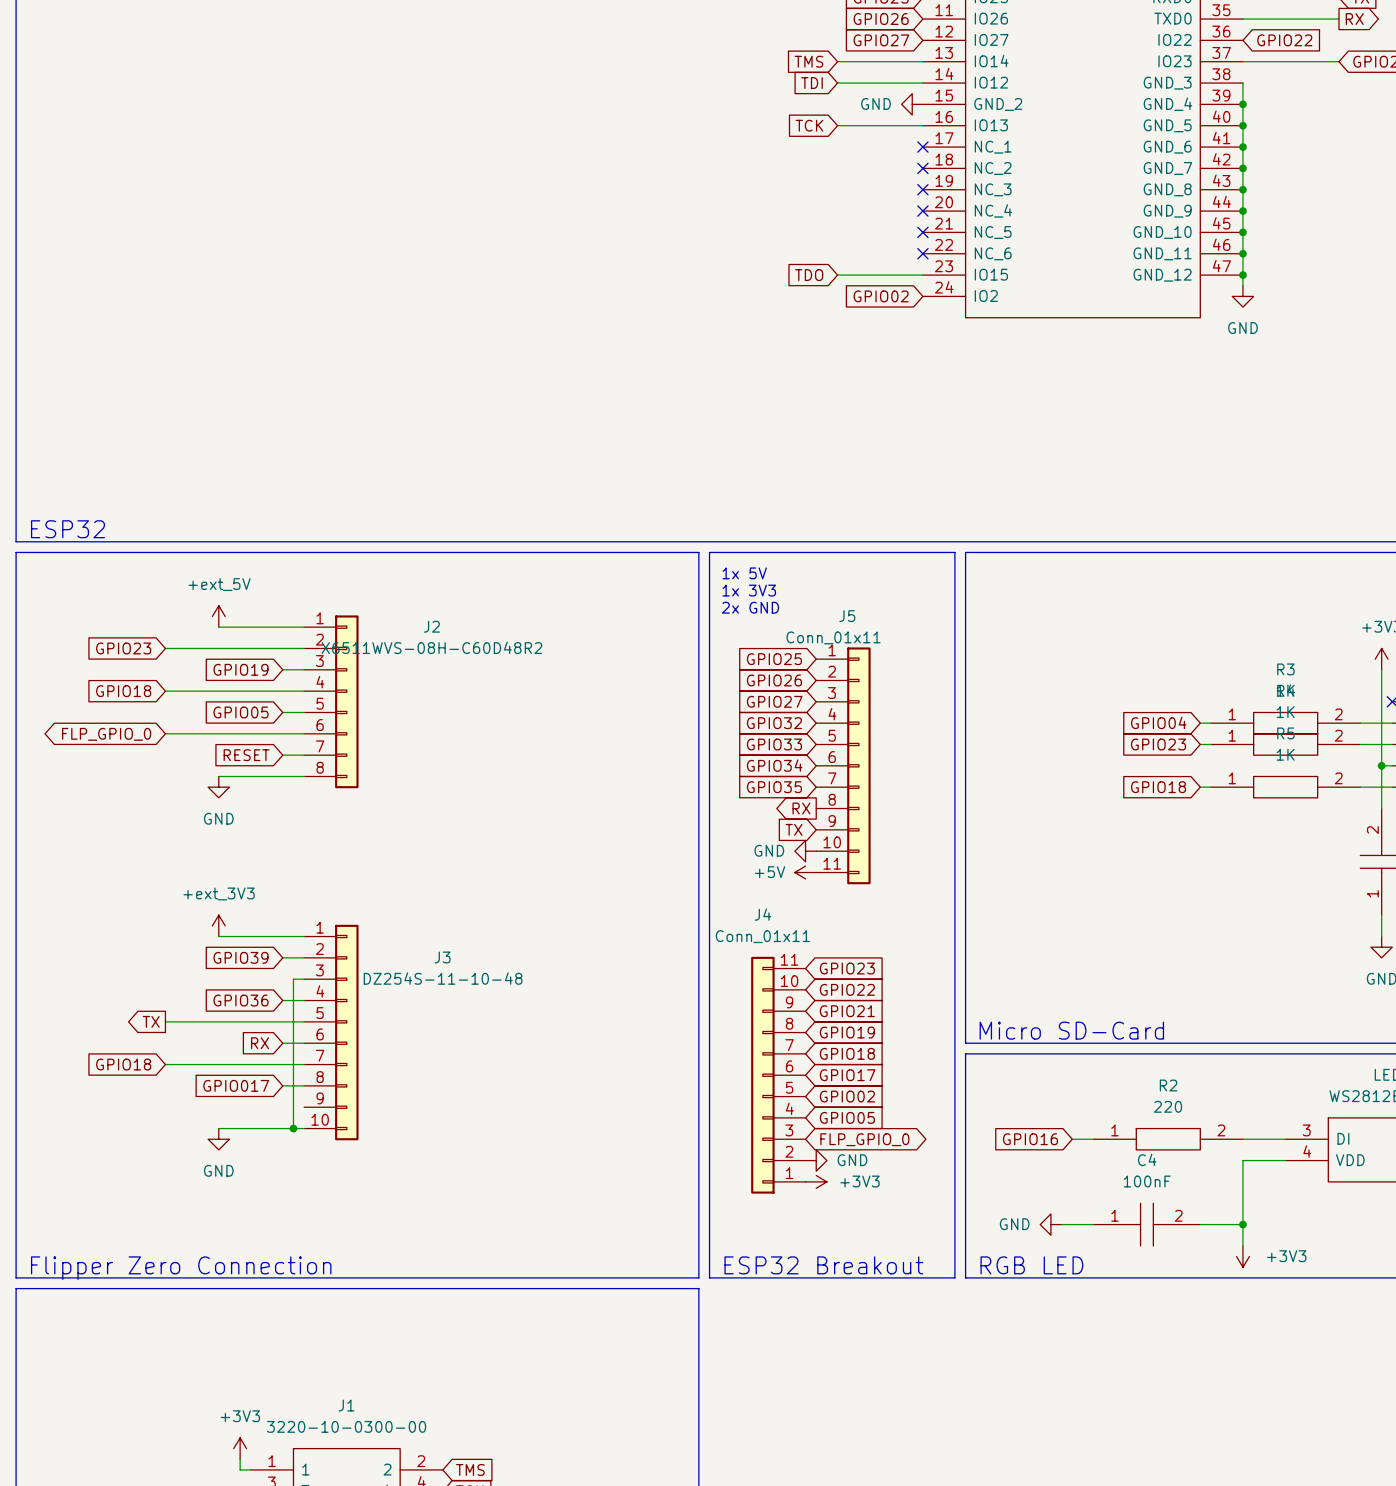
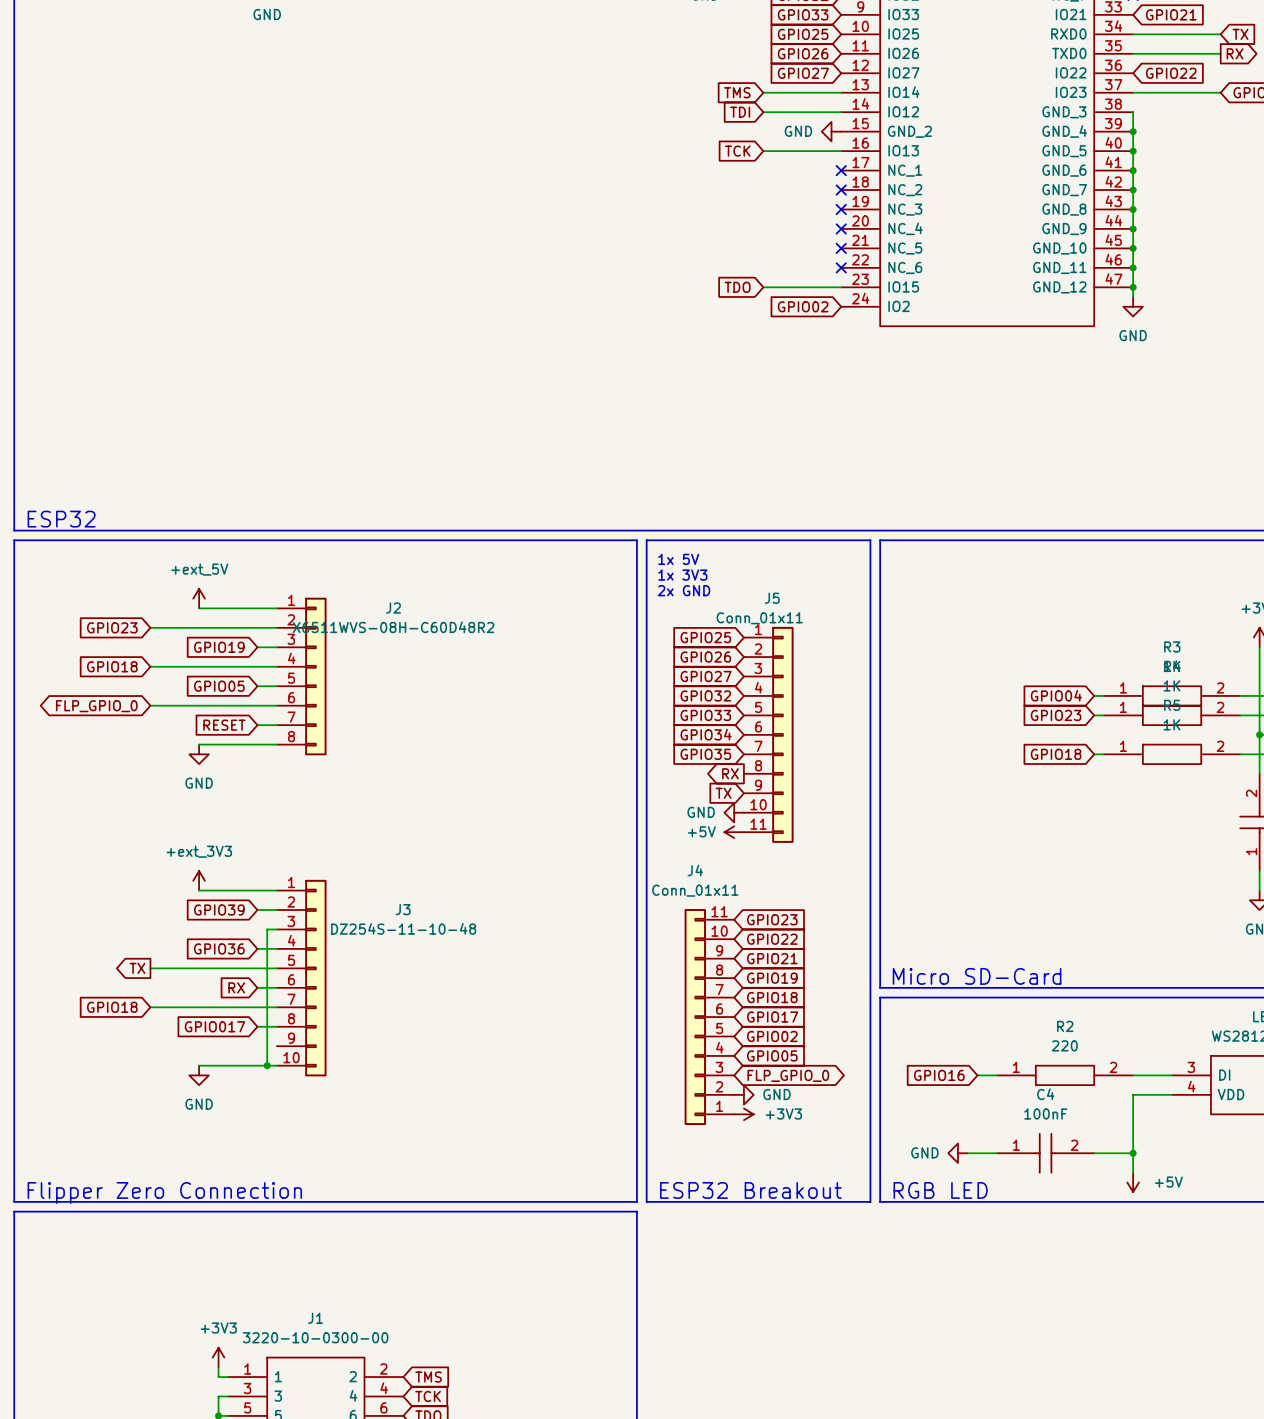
power symbol: +3V3 (1242, 1256) -> +5V (1133, 1182)

